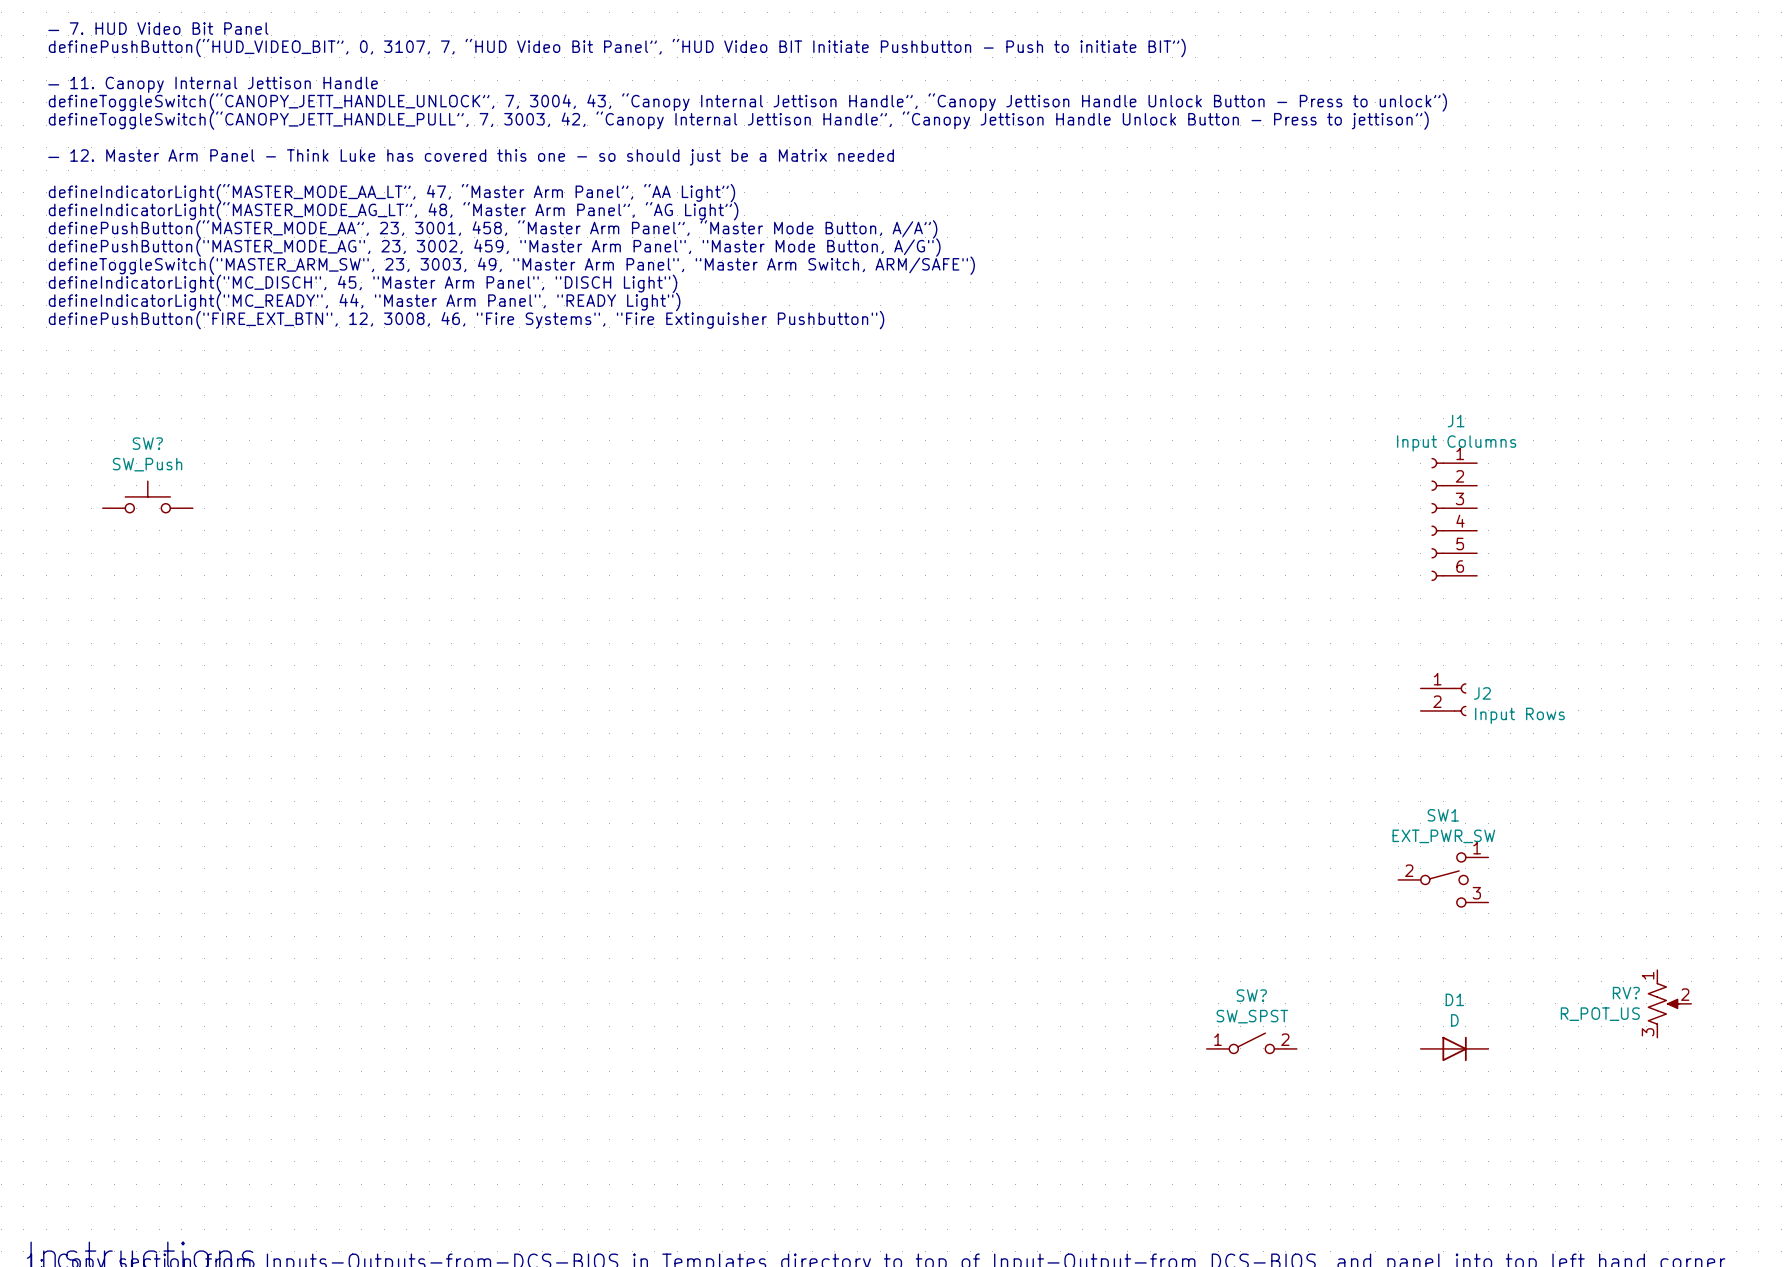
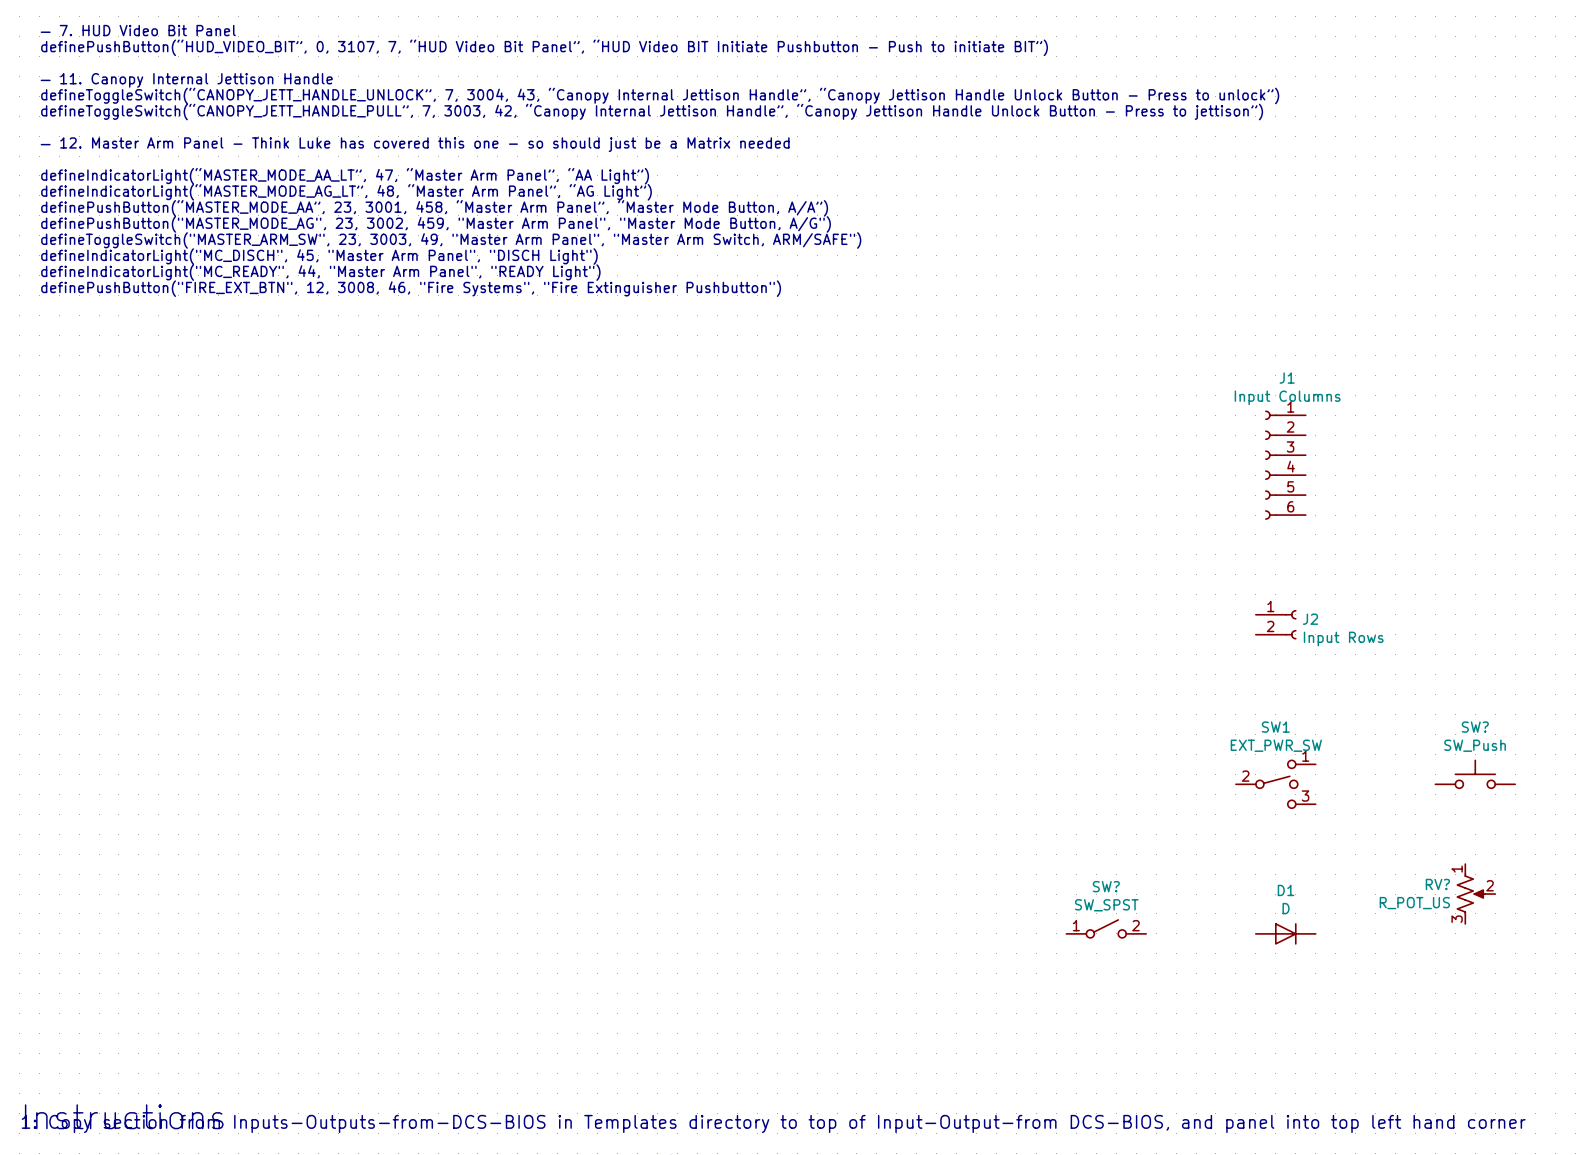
SW?: SW_Push (147, 496) -> none
SW?: none -> SW_Push (1475, 774)

